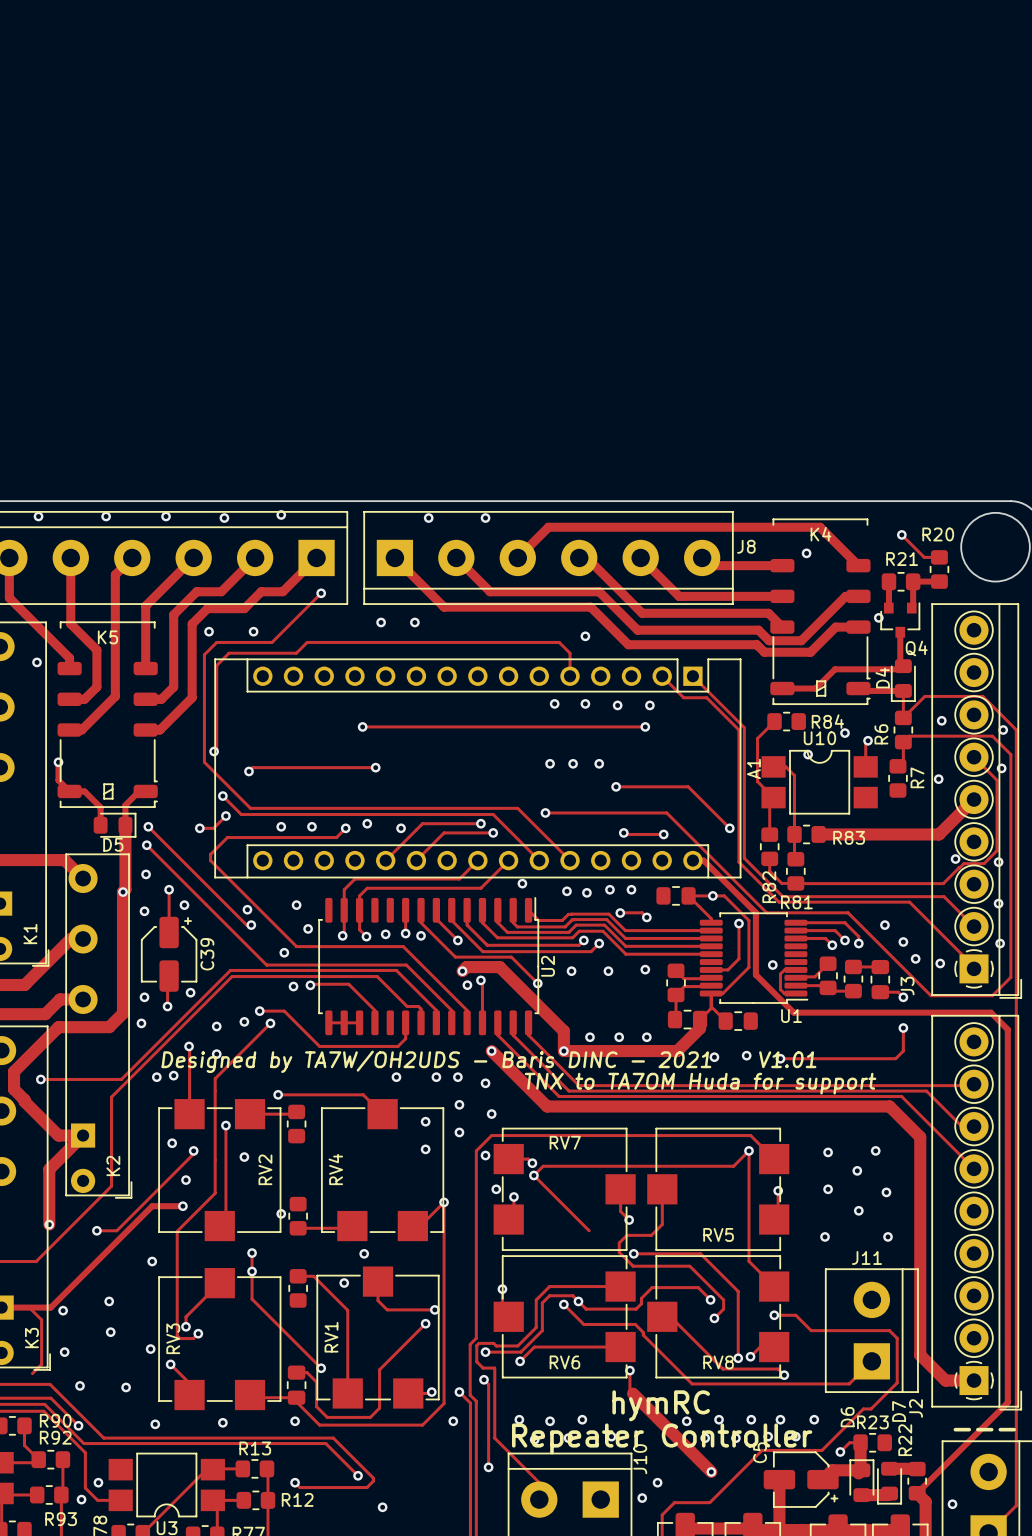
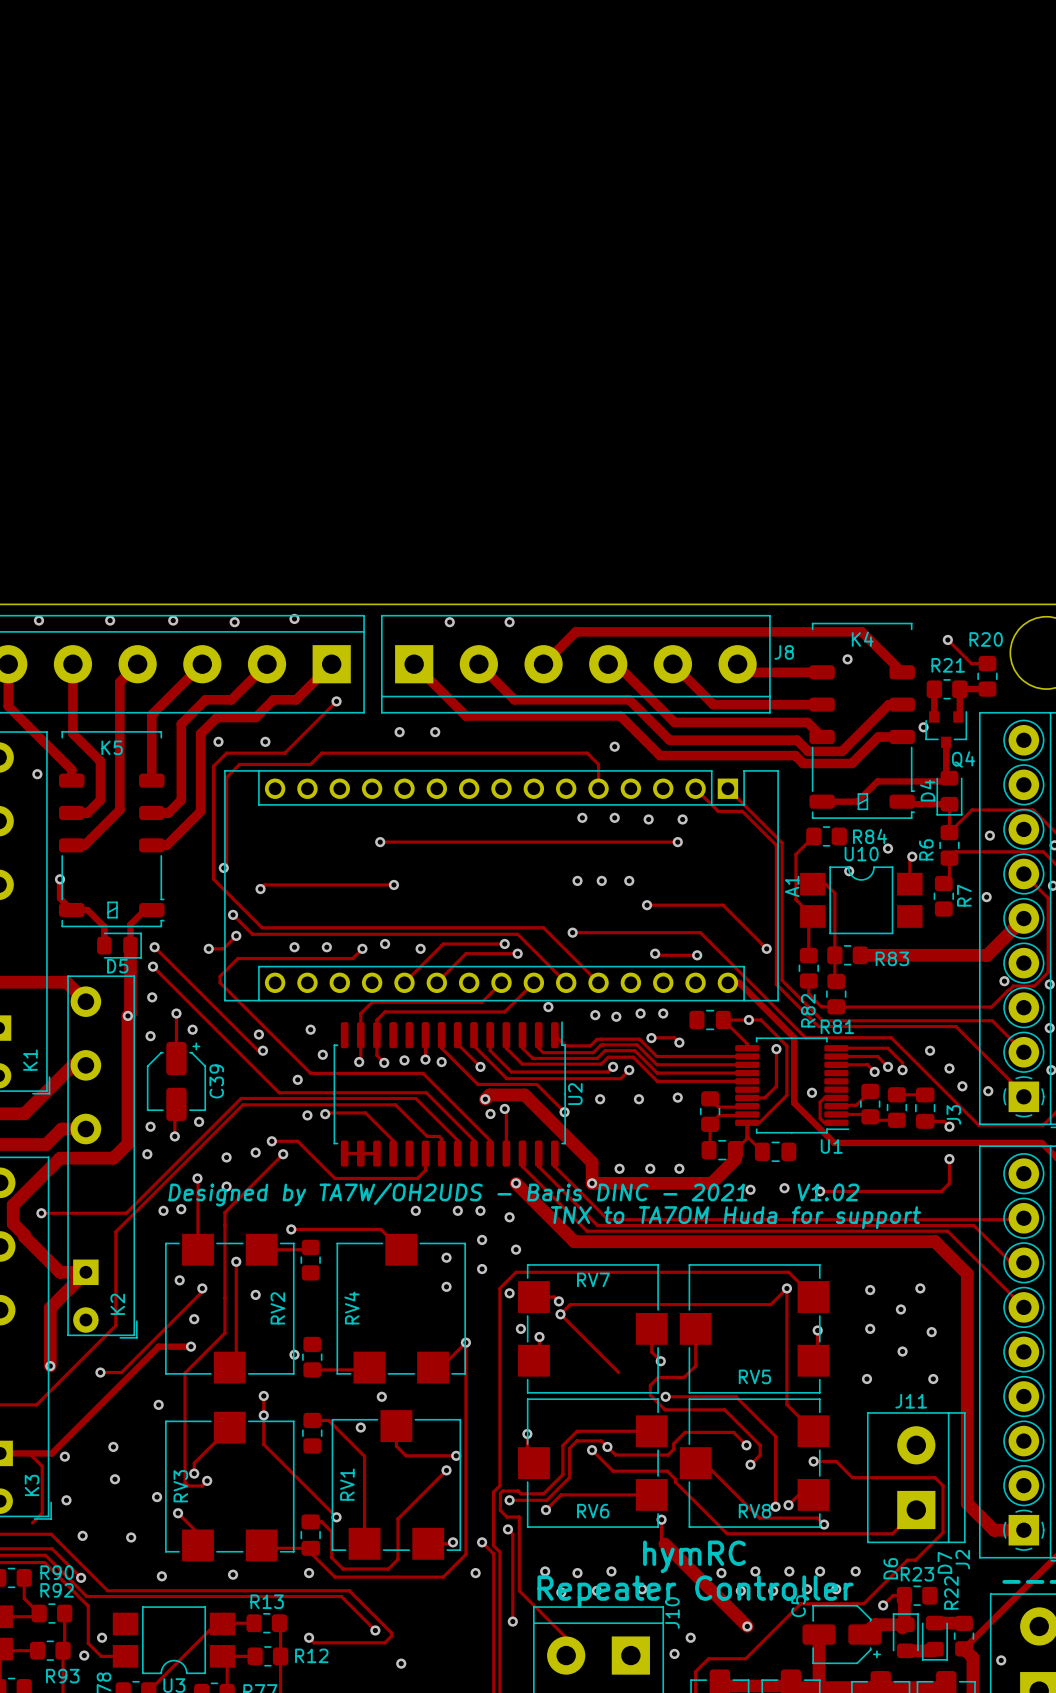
text: Designed by TA7W/OH2UDS - Baris DINC - 2021 V1.01 (488, 1061) -> Designed by TA7W/OH2UDS - Baris DINC - 2021 V1.02 (513, 1194)

